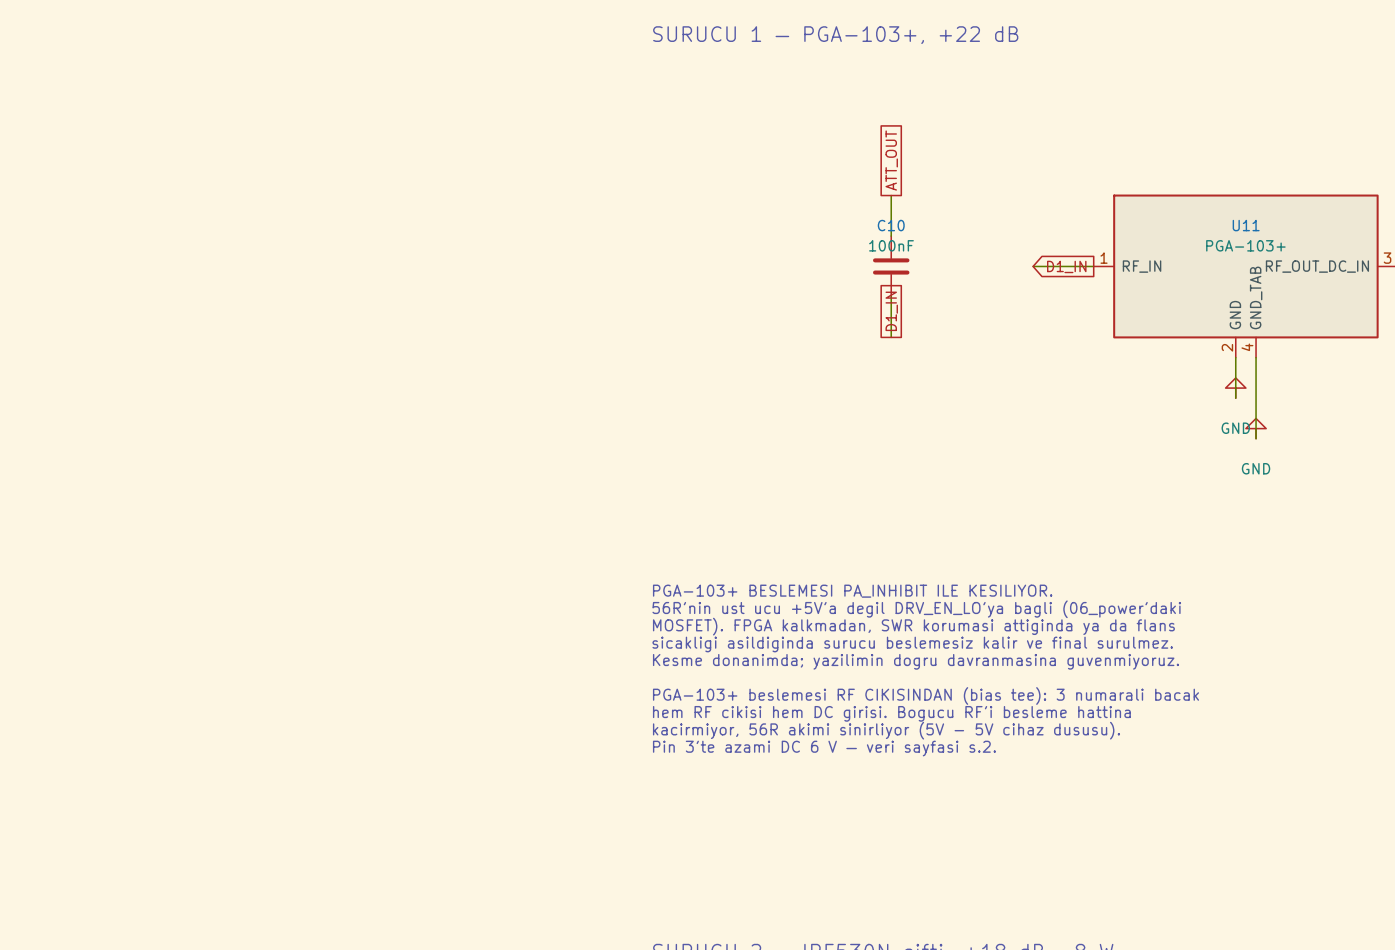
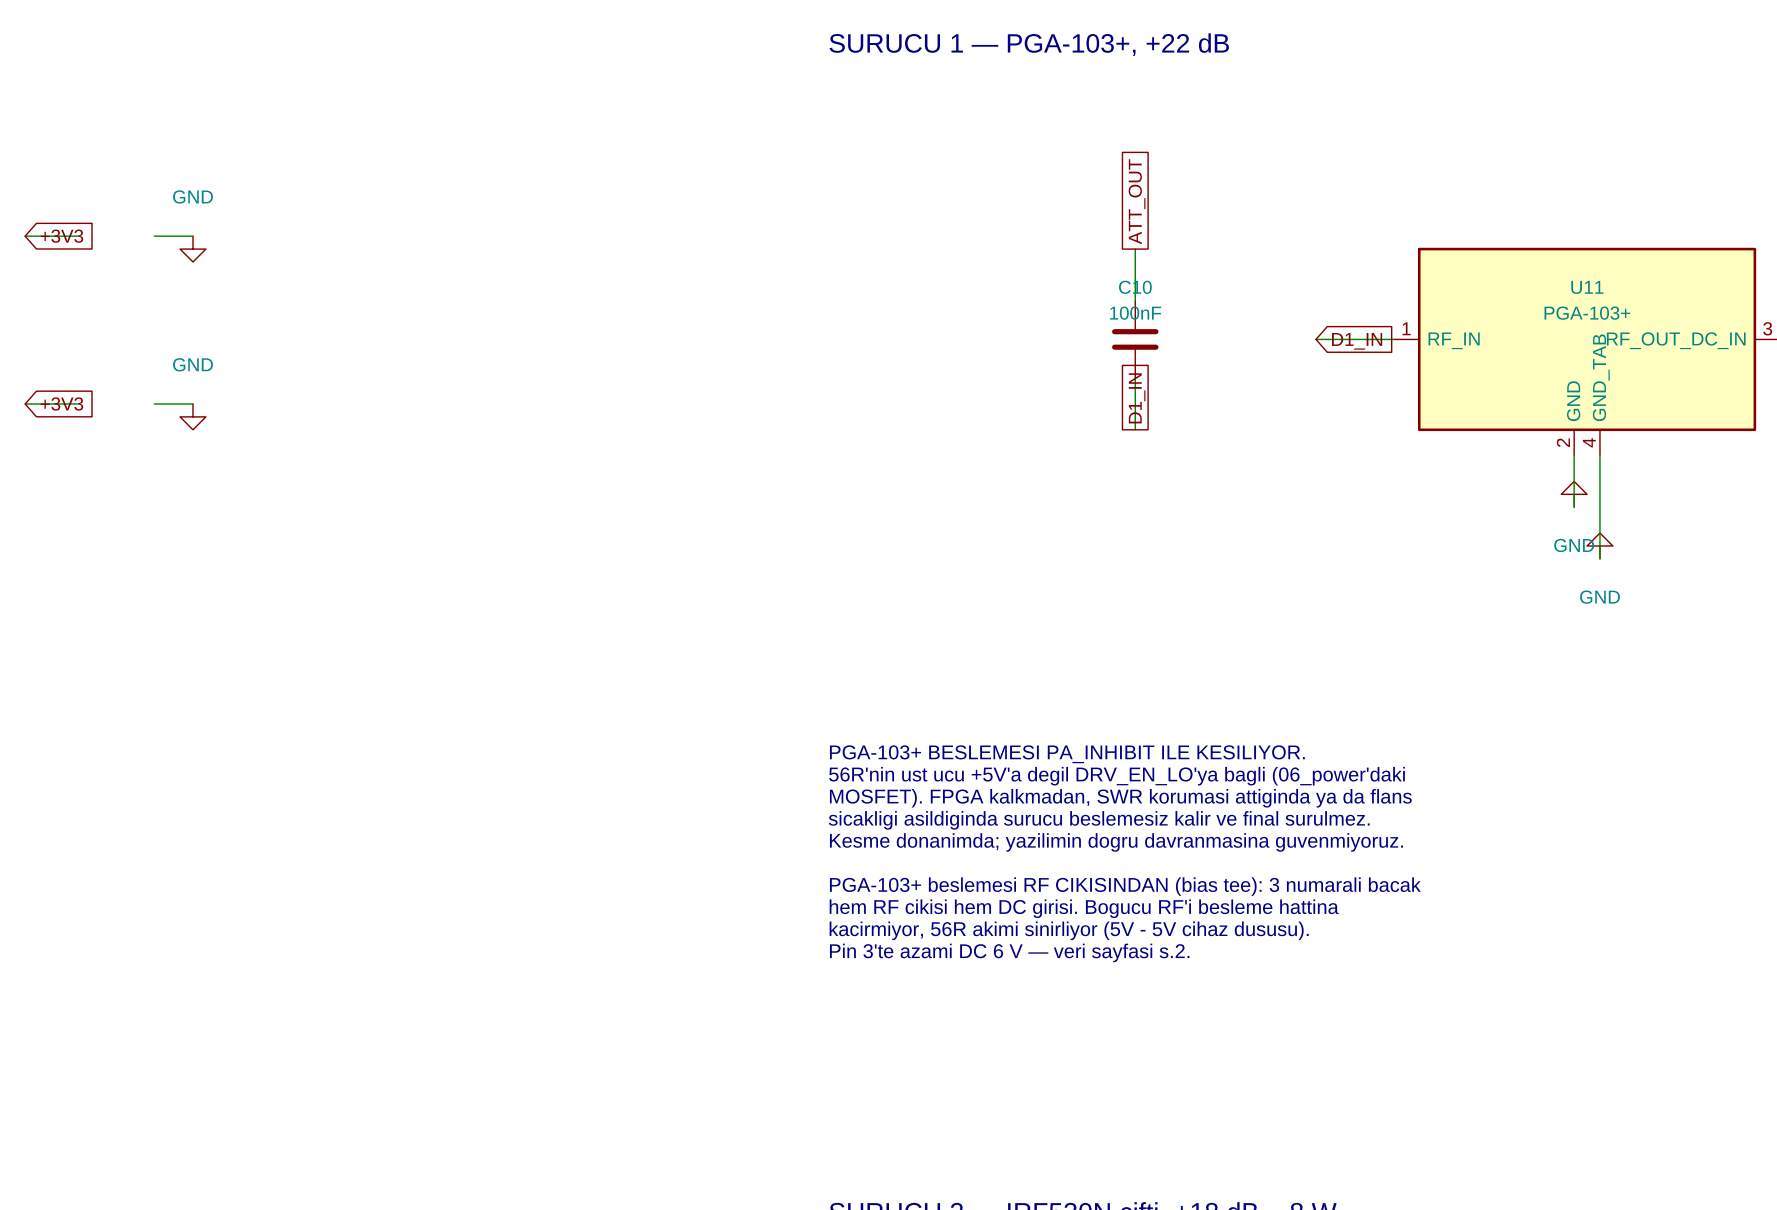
wire: none -> (25, 236) (76, 236)
global label: none -> +3V3 (61, 236)
wire: none -> (154, 236) (192, 236)
power symbol: none -> GND (192, 249)
wire: none -> (25, 403) (76, 403)
global label: none -> +3V3 (61, 403)
wire: none -> (154, 403) (192, 403)
power symbol: none -> GND (192, 416)

